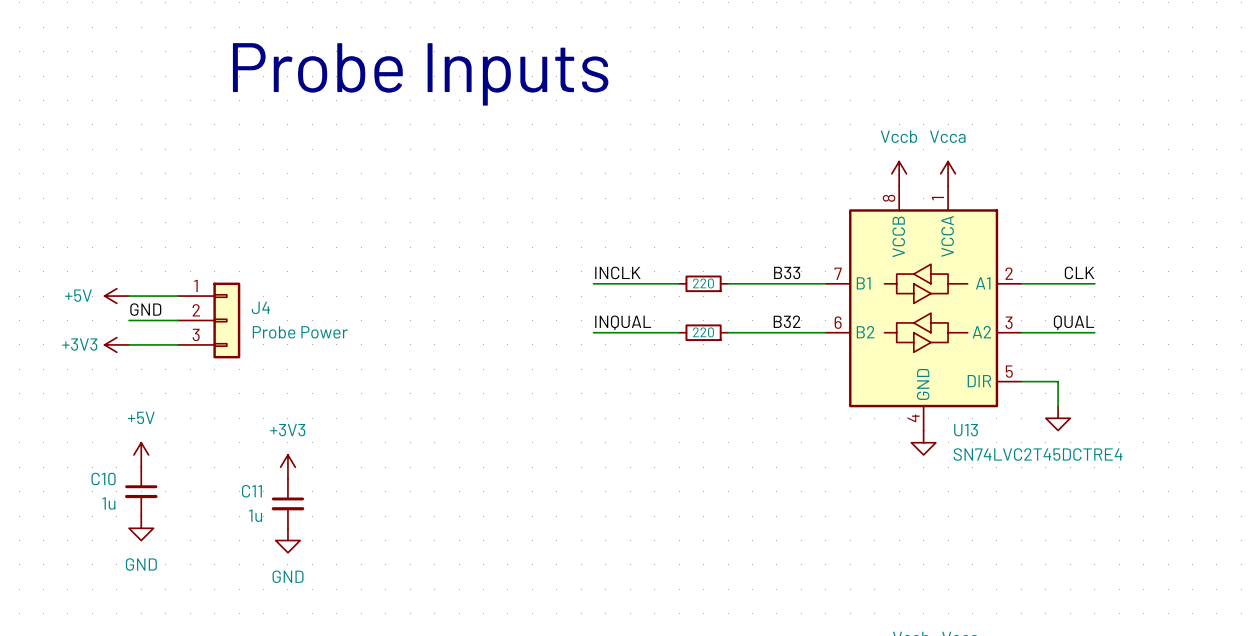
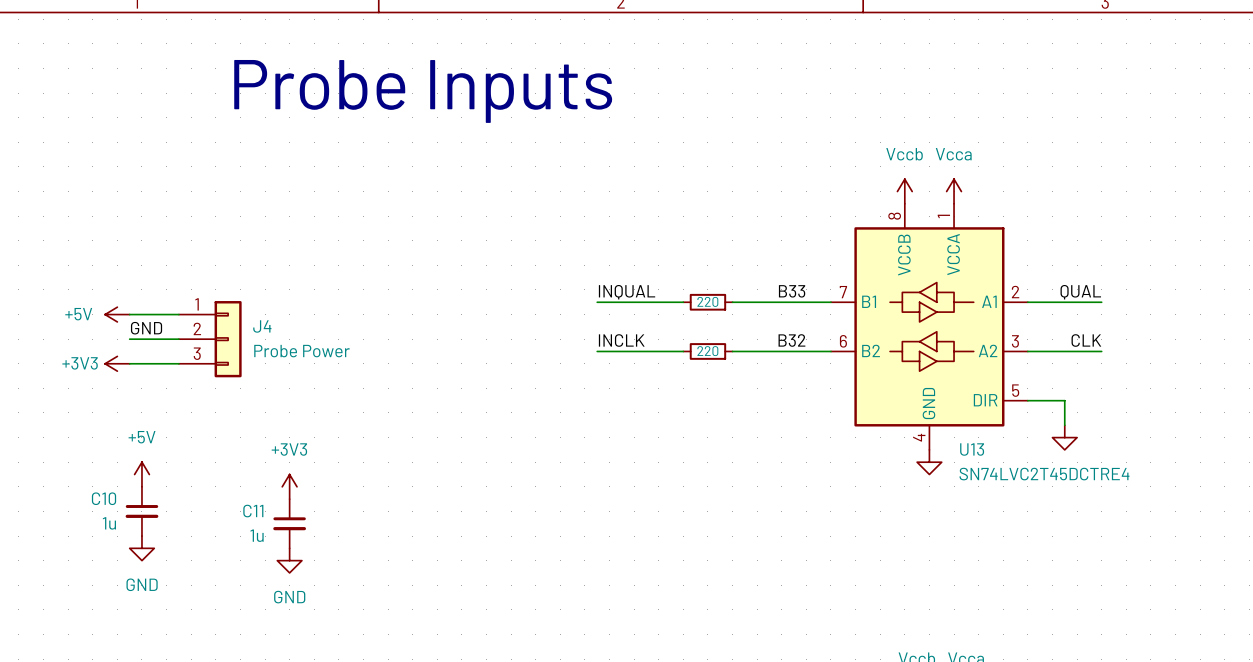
label: INCLK (617, 272) -> INQUAL (627, 292)
label: CLK (1079, 272) -> QUAL (1080, 292)
label: INQUAL (623, 322) -> INCLK (621, 340)
label: QUAL (1073, 322) -> CLK (1086, 340)

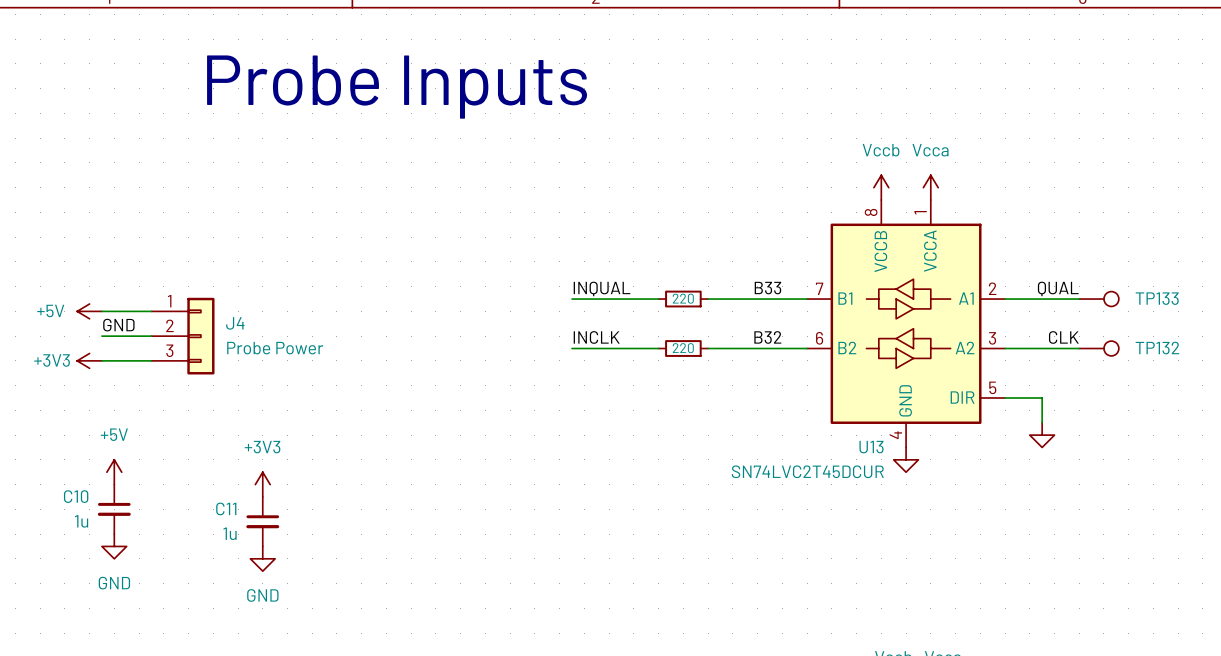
TP133: none -> (1099, 299)
TP132: none -> (1099, 348)
U13 name position: U13 (972, 449) -> U13 (871, 447)
U13 value: SN74LVC2T45DCTRE4 (1044, 474) -> SN74LVC2T45DCUR (807, 471)

